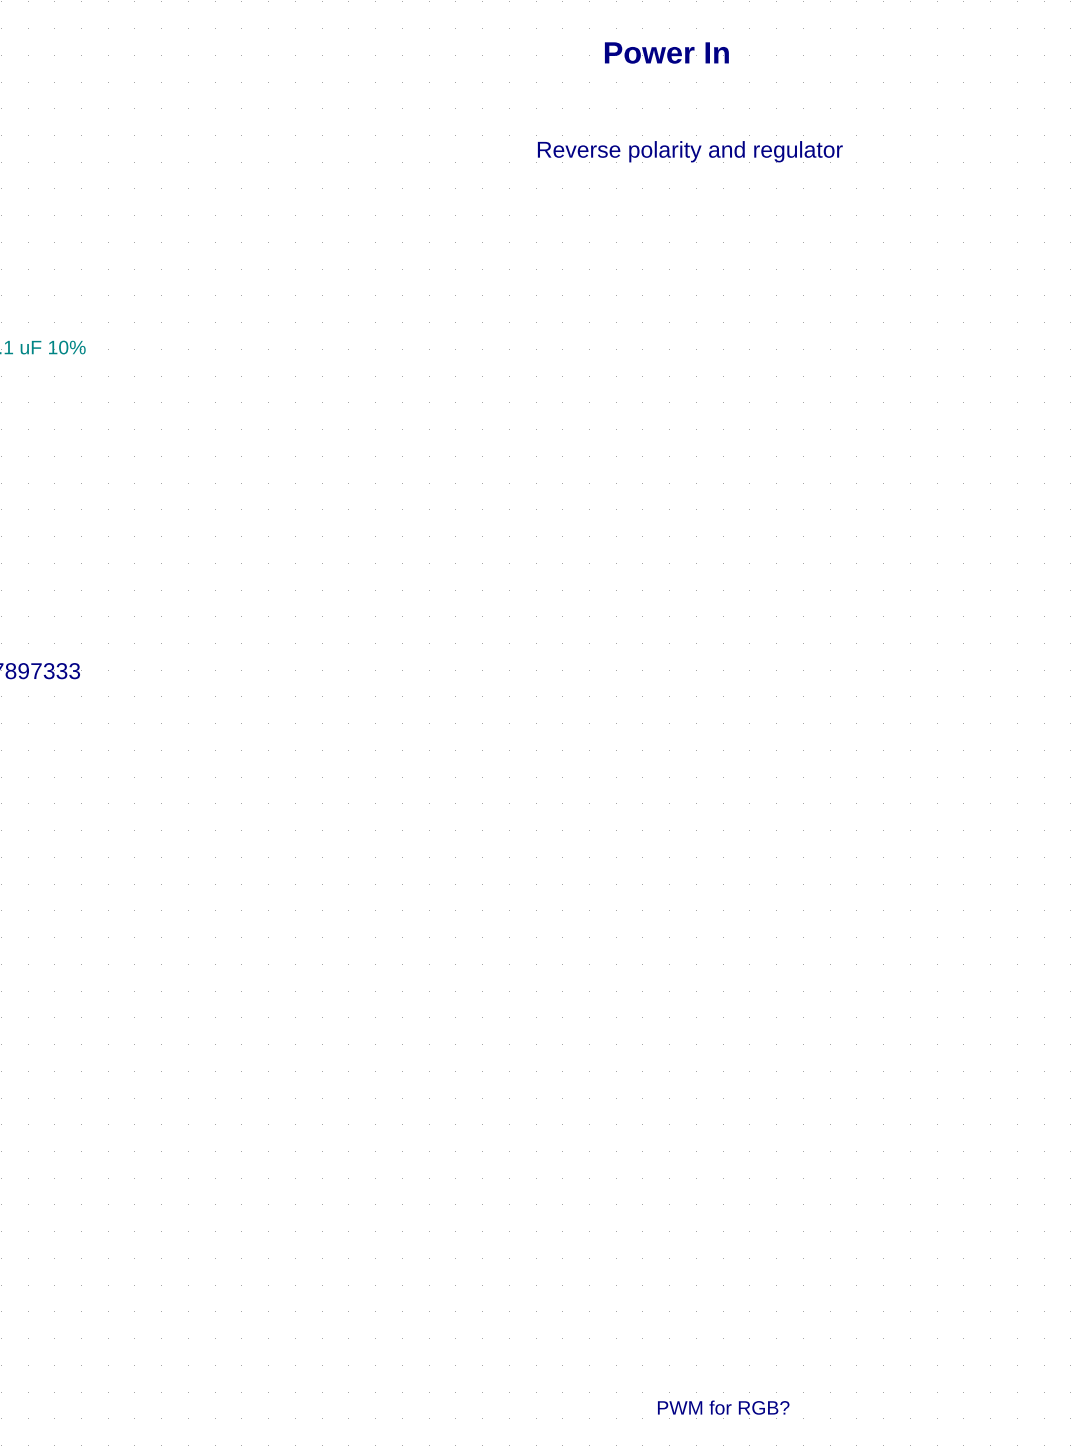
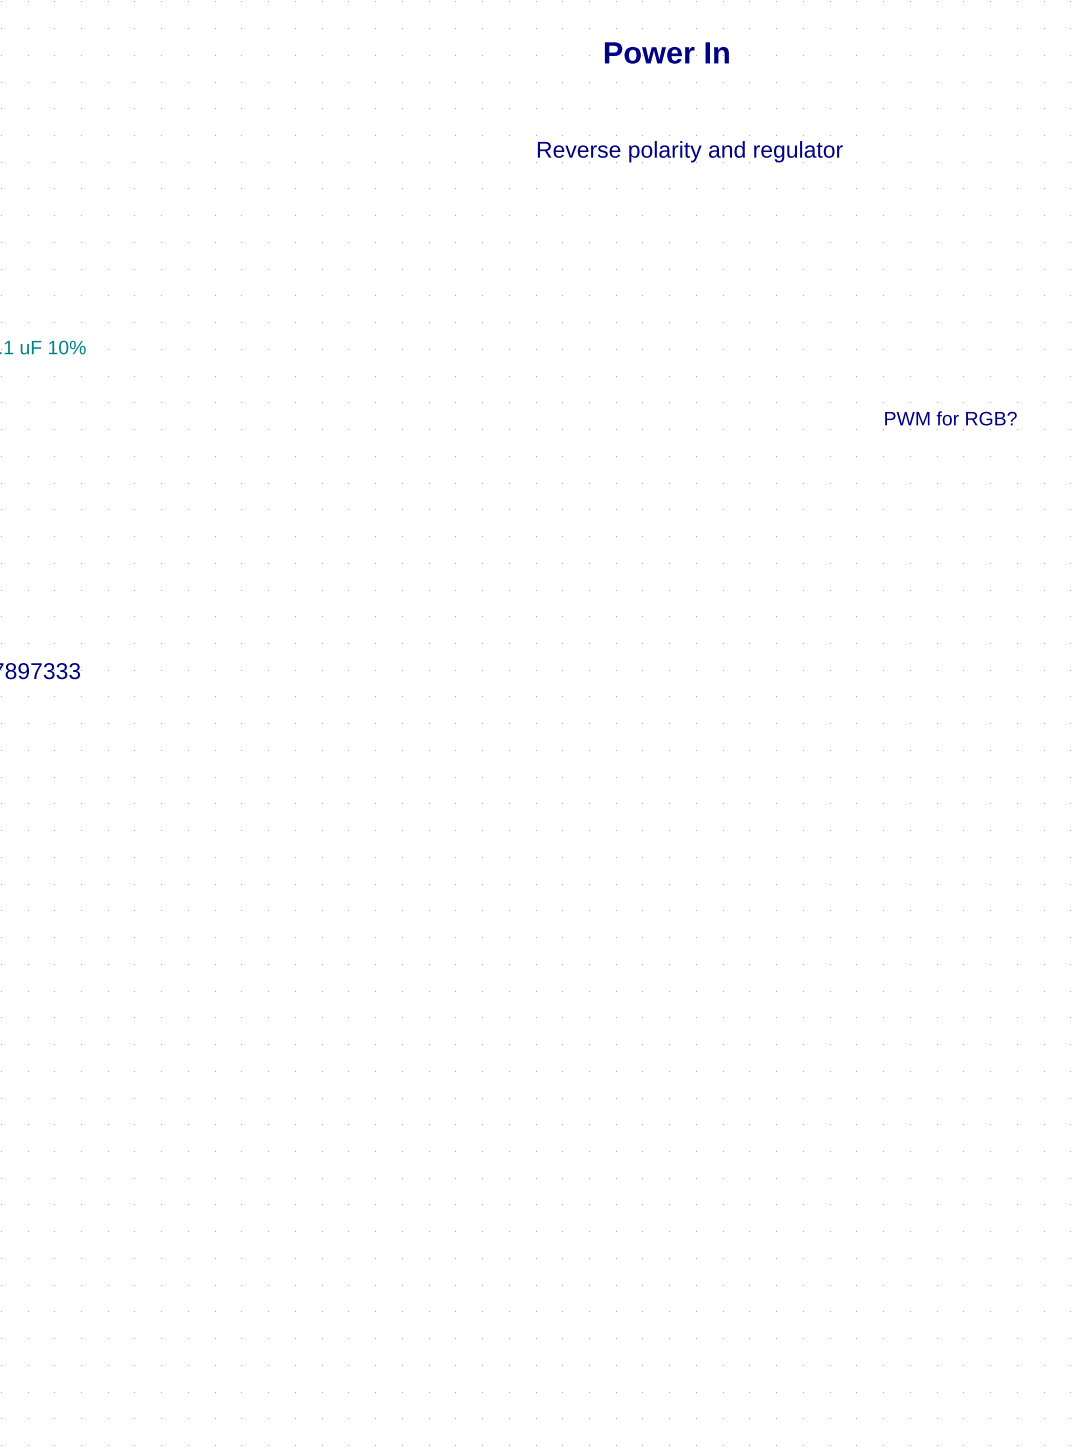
text: none -> PWM for RGB? (950, 418)
text: PWM for RGB? (723, 1407) -> none

